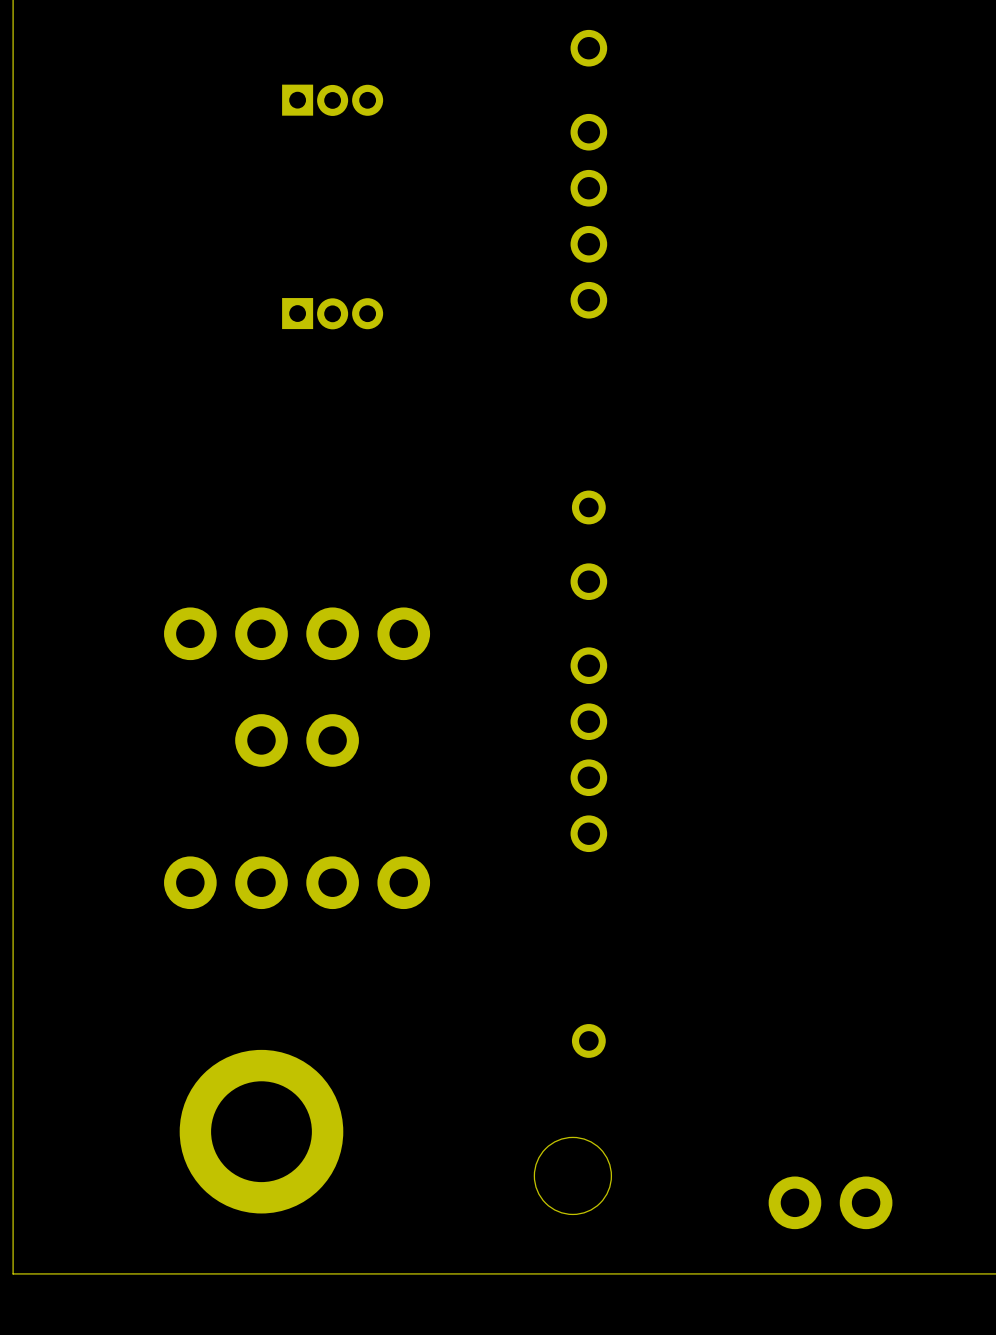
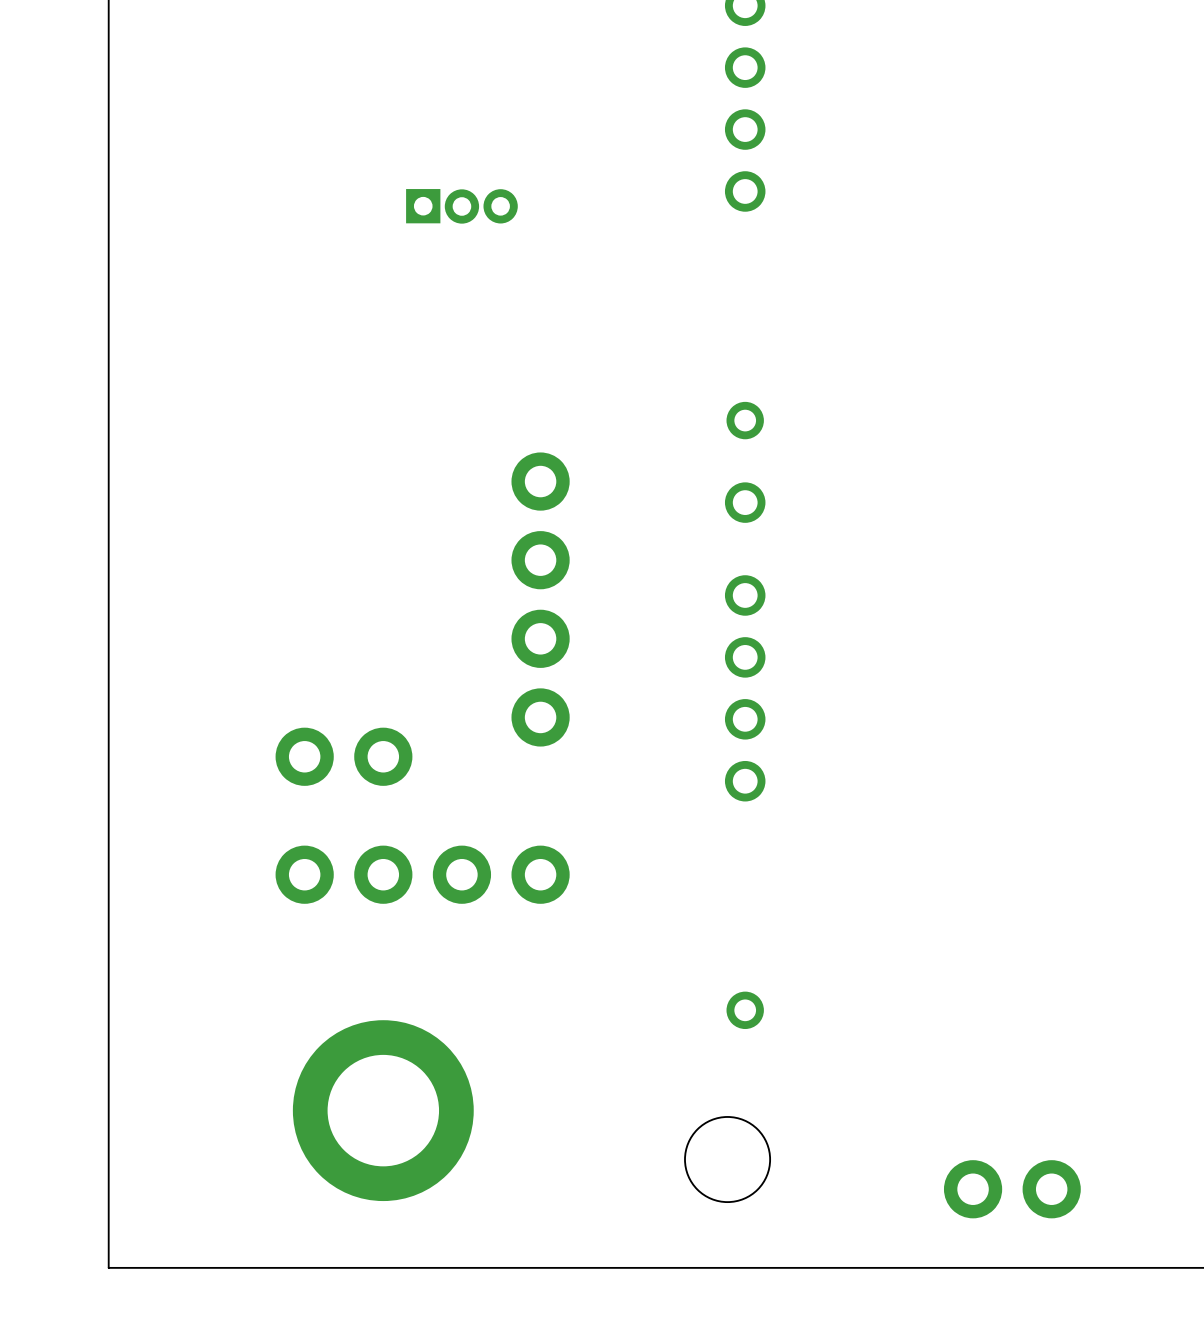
part rotation: 0° (297, 633) -> 90° clockwise (540, 599)
part position: (297, 740) -> (343, 756)
part position: (297, 882) -> (422, 874)

